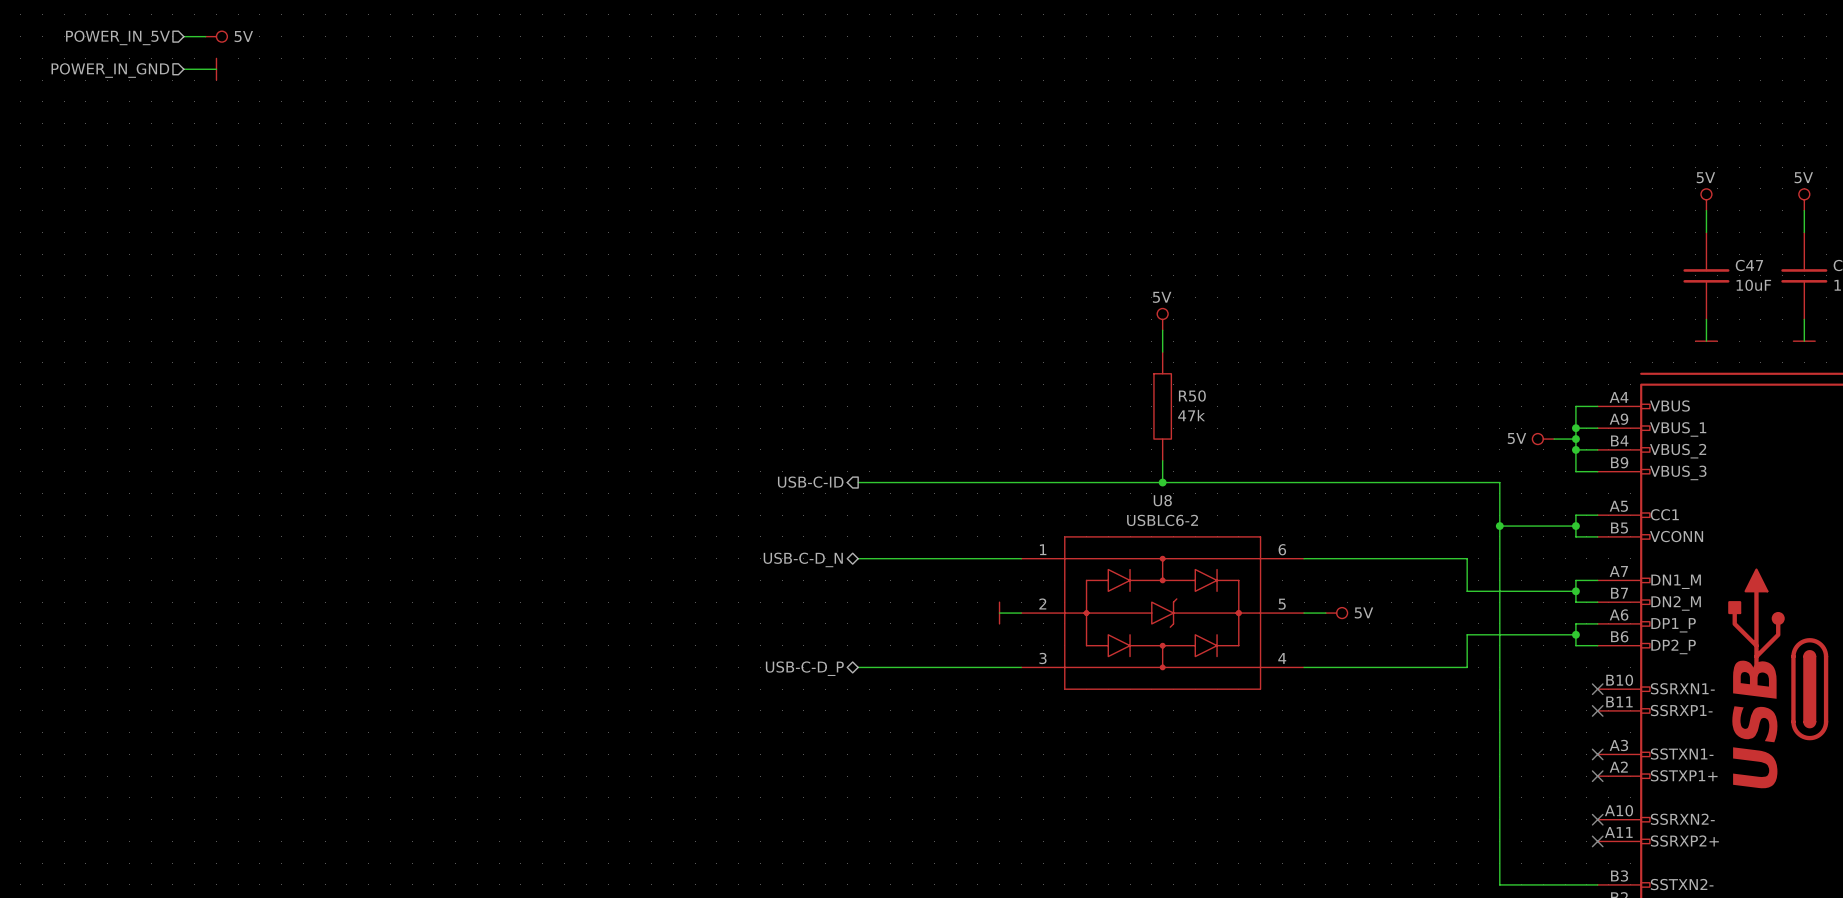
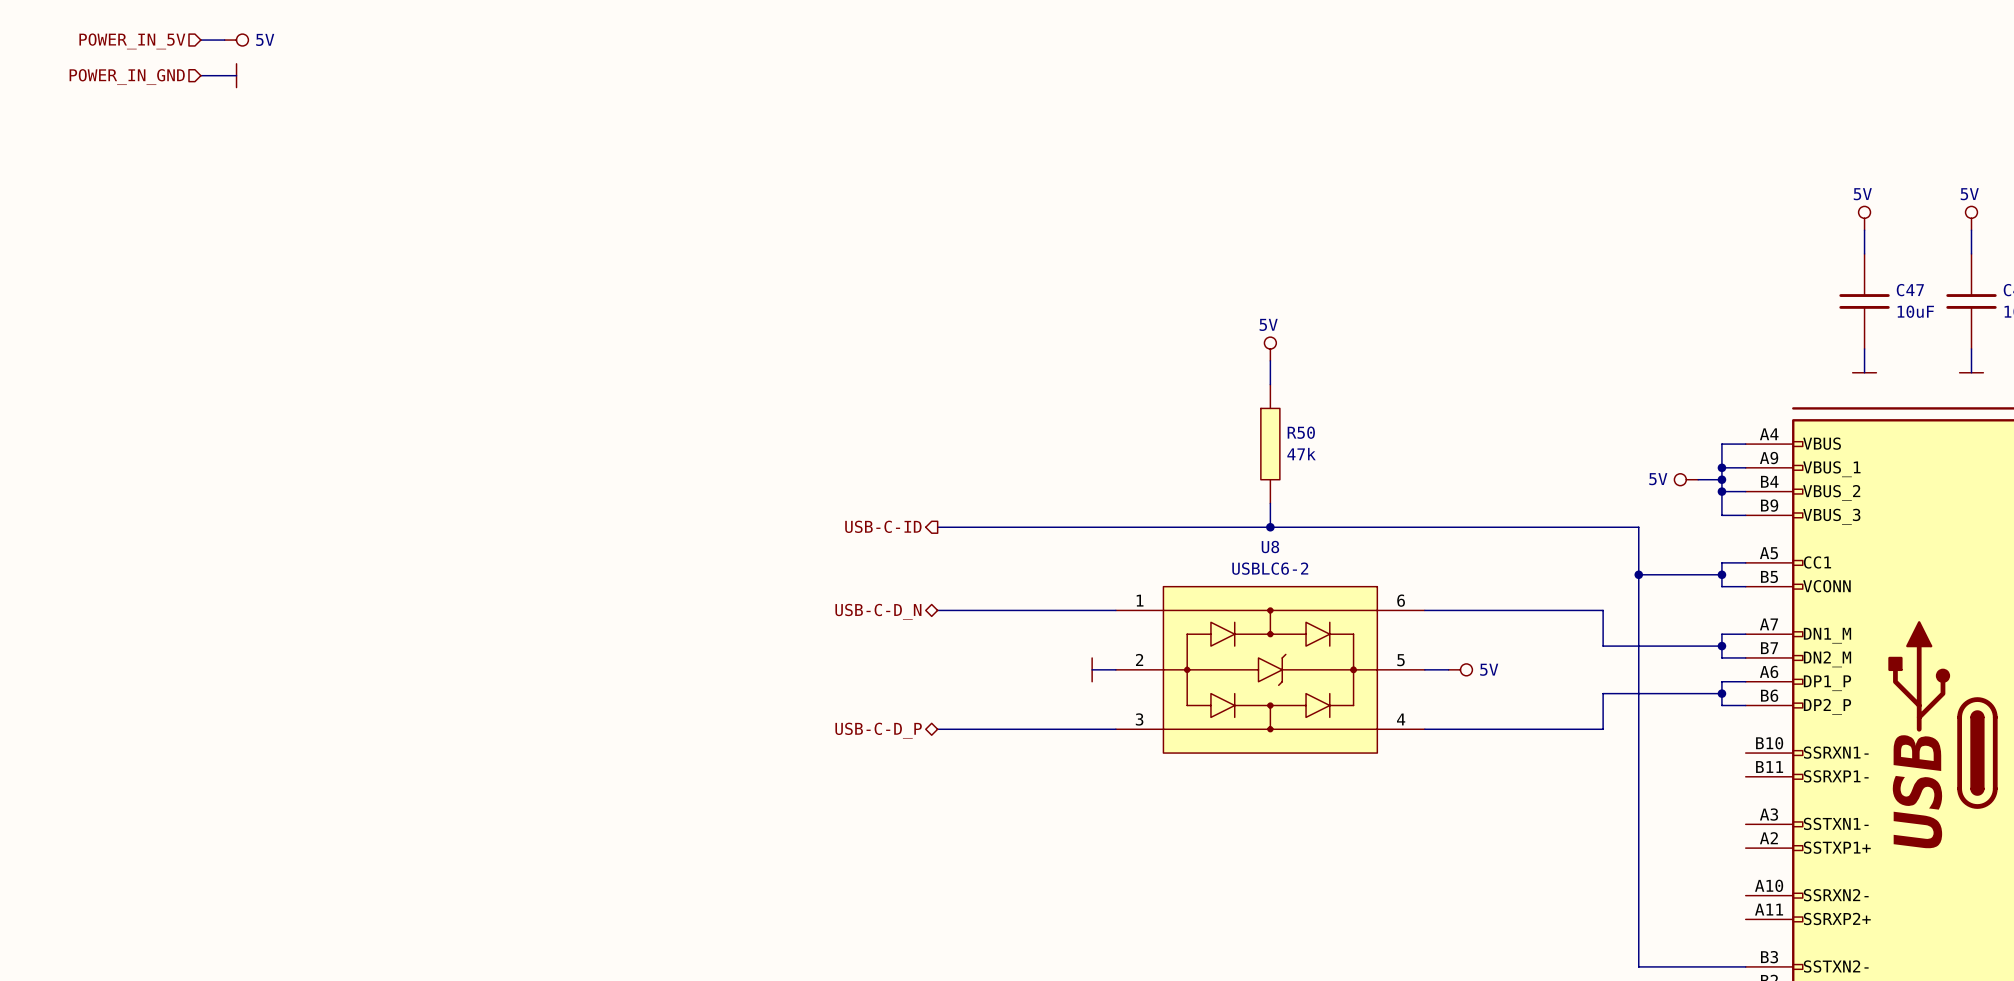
no-connect mark: (1597, 689) -> none
no-connect mark: (1597, 710) -> none
no-connect mark: (1597, 754) -> none
no-connect mark: (1597, 776) -> none
no-connect mark: (1597, 819) -> none
no-connect mark: (1597, 841) -> none

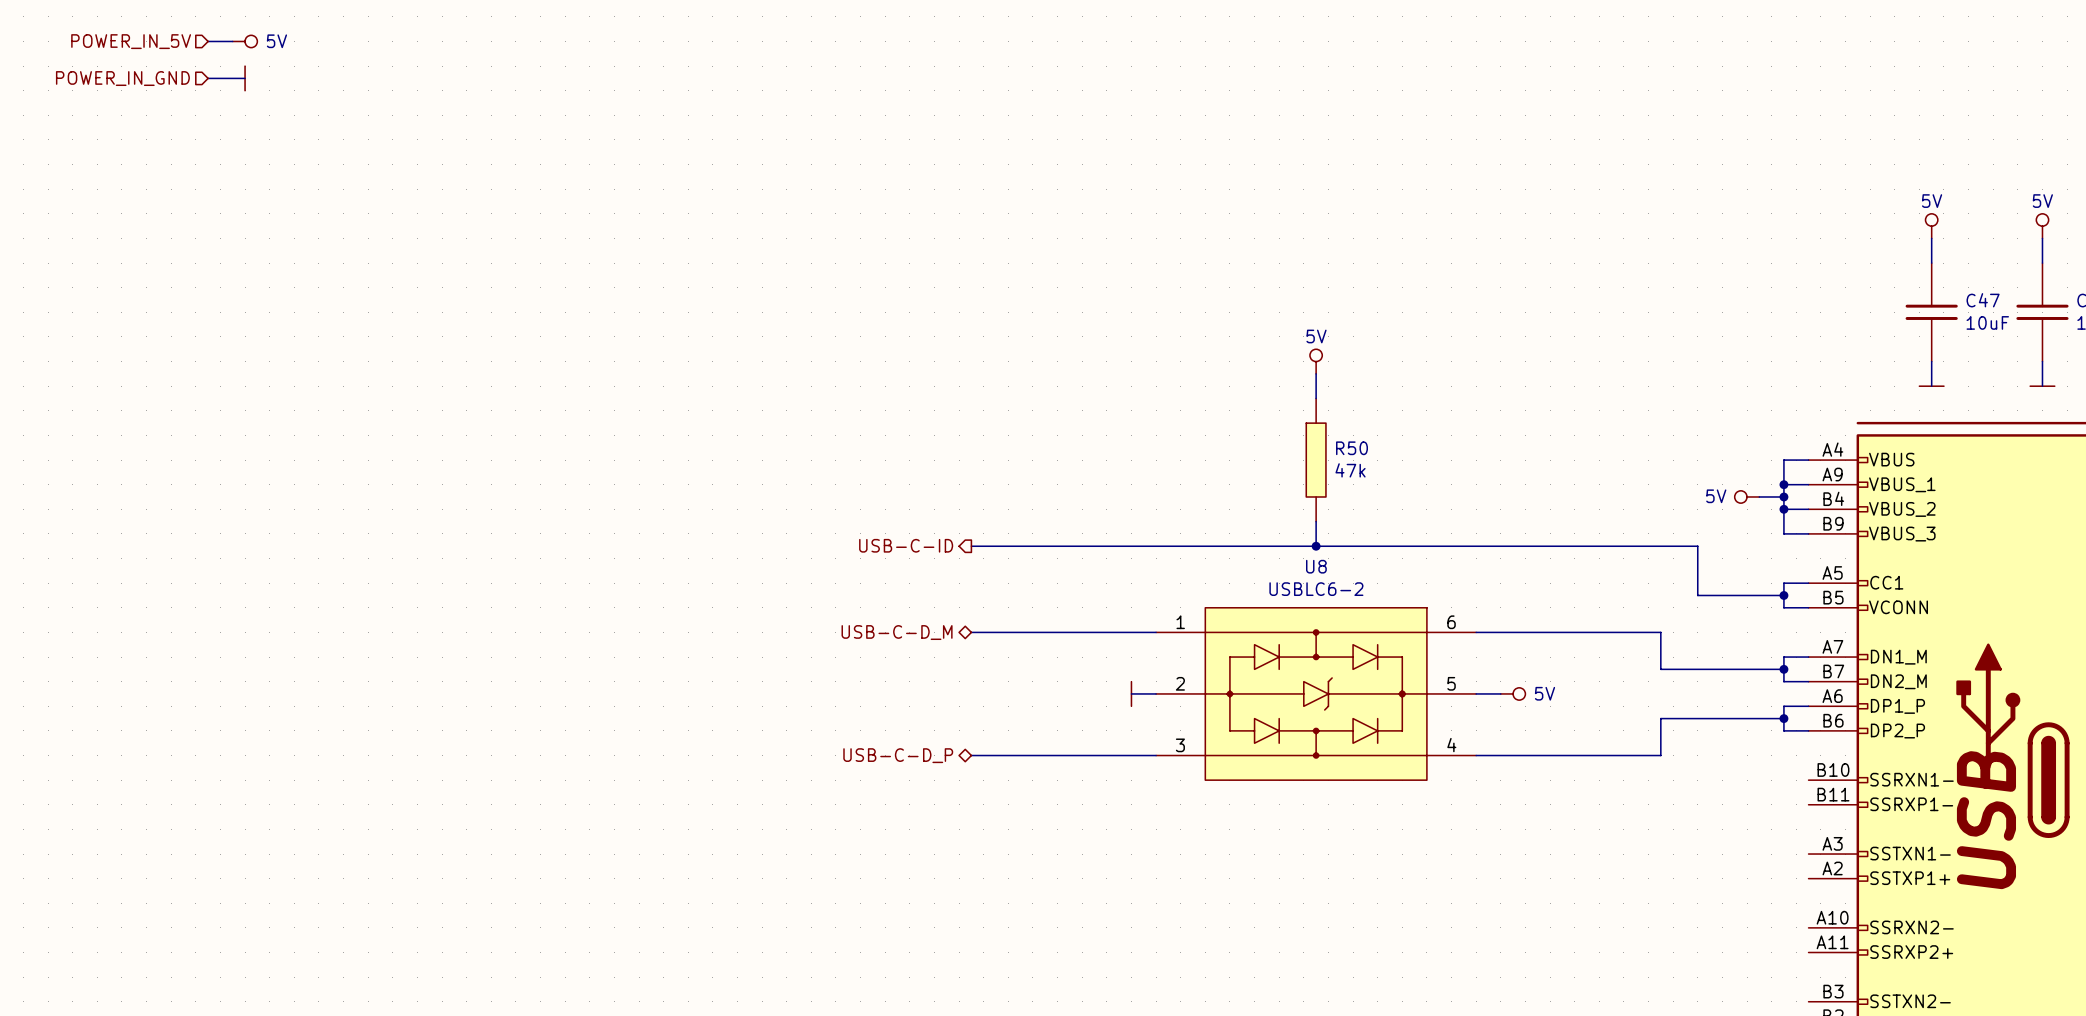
wire: (1638, 574) (1638, 966) (1745, 966) -> none
junction: (1638, 574) -> none
hierarchical label: USB-C-D_N (878, 611) -> USB-C-D_M (897, 632)

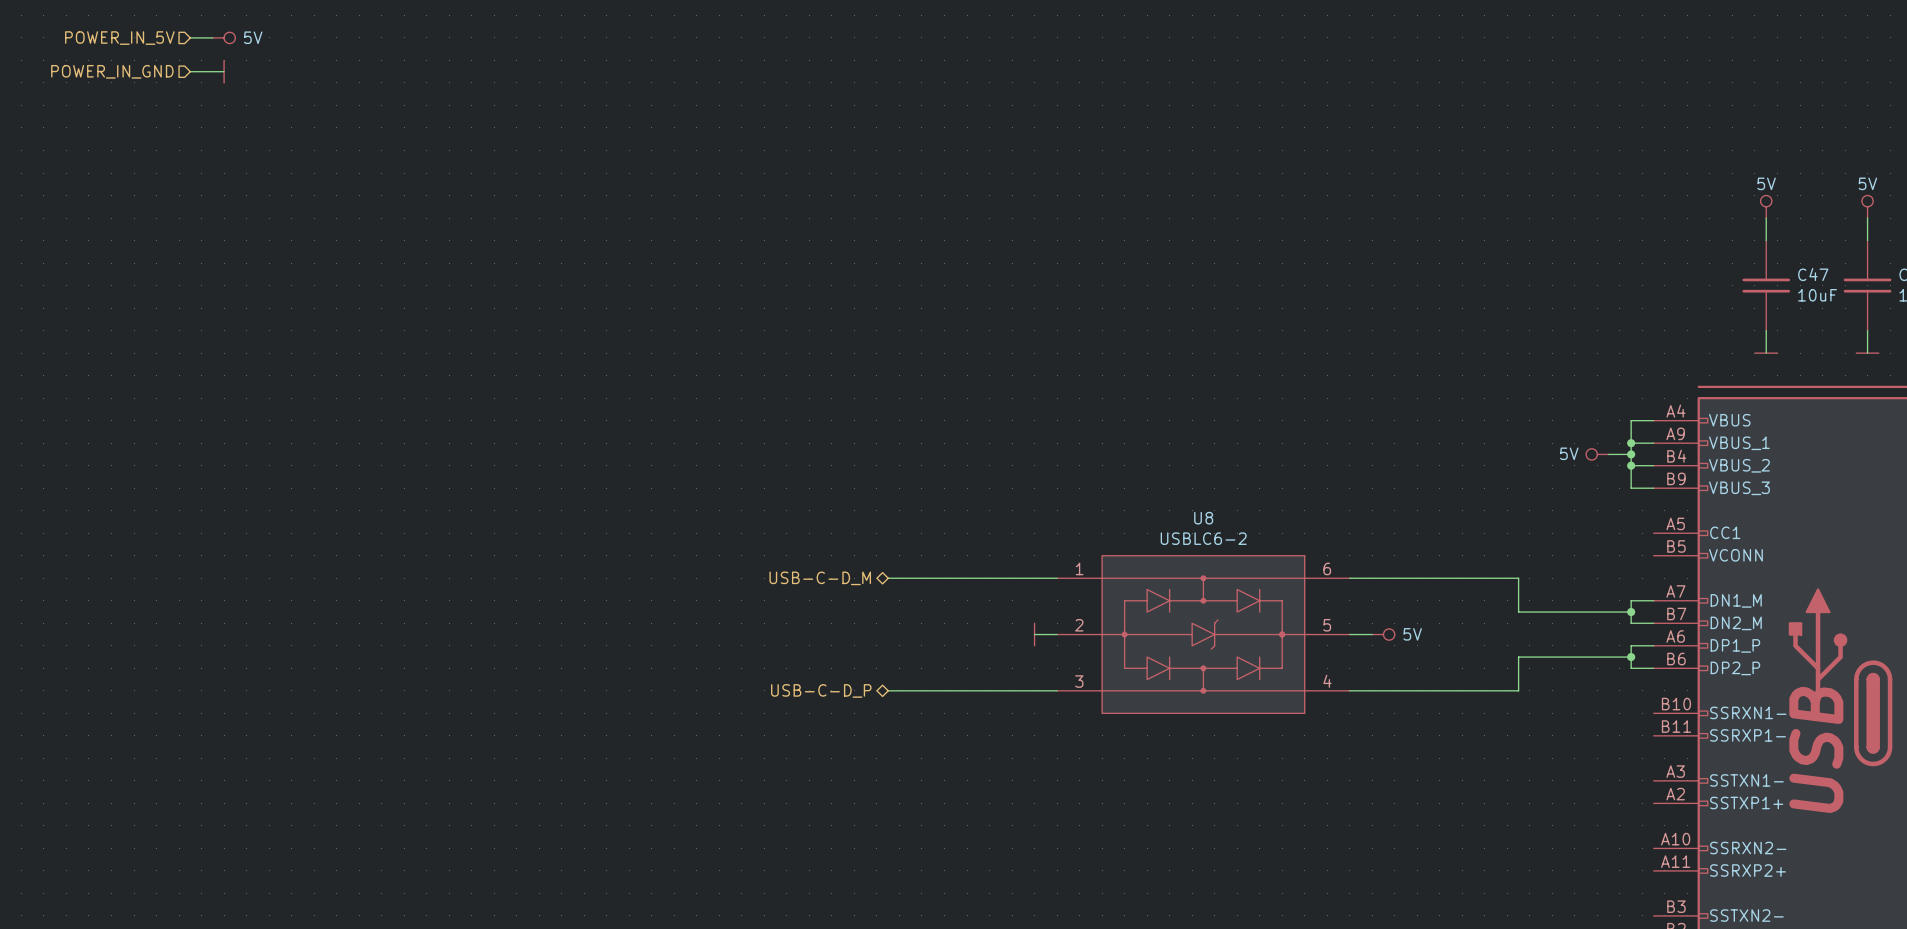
power symbol: 5V (1316, 361) -> none
wire: (1316, 373) (1316, 398) -> none
R50: 47k (1316, 460) -> none
wire: (1316, 521) (1316, 546) -> none
hierarchical label: USB-C-ID (906, 545) -> none
wire: (971, 546) (1697, 546) (1697, 595) (1783, 595) -> none
junction: (1316, 546) -> none
wire: (1808, 583) (1783, 583) (1783, 607) (1808, 607) -> none
junction: (1783, 595) -> none

